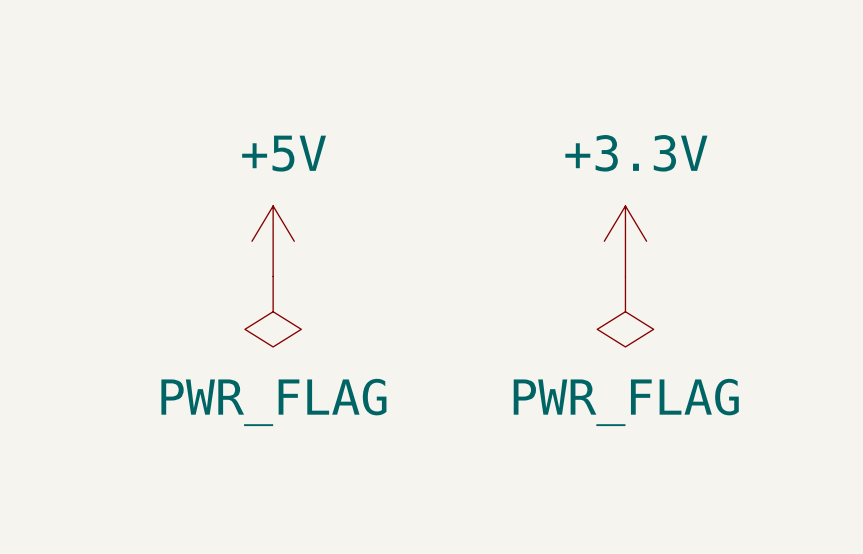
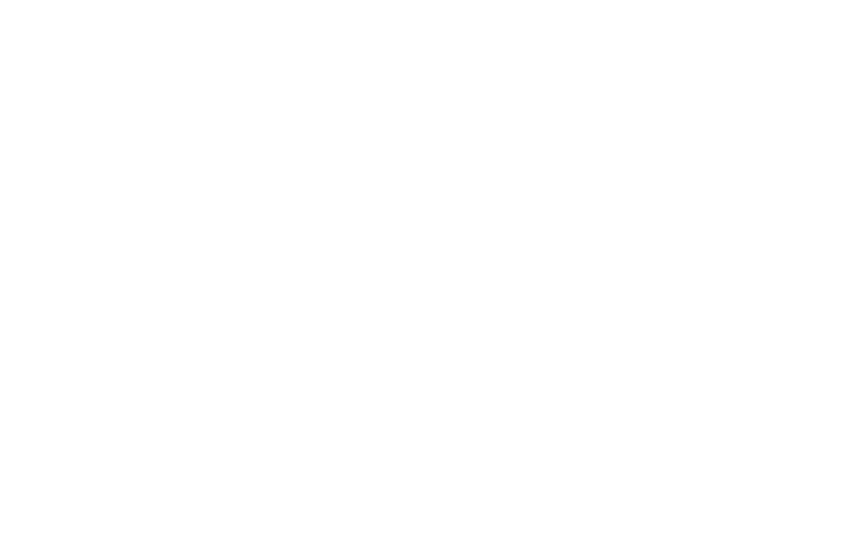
power symbol: +5V (273, 241) -> none
power symbol: +3.3V (625, 241) -> none
power symbol: PWR_FLAG (273, 311) -> none
power symbol: PWR_FLAG (625, 311) -> none

